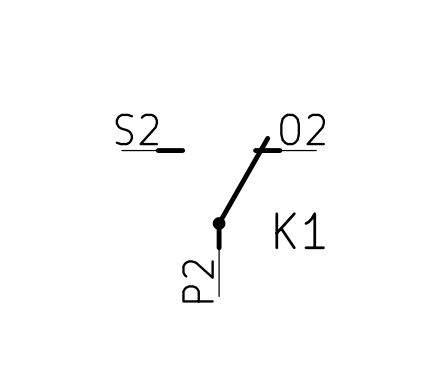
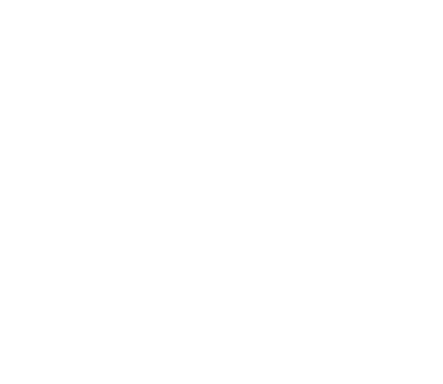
K1: (219, 216) -> none

